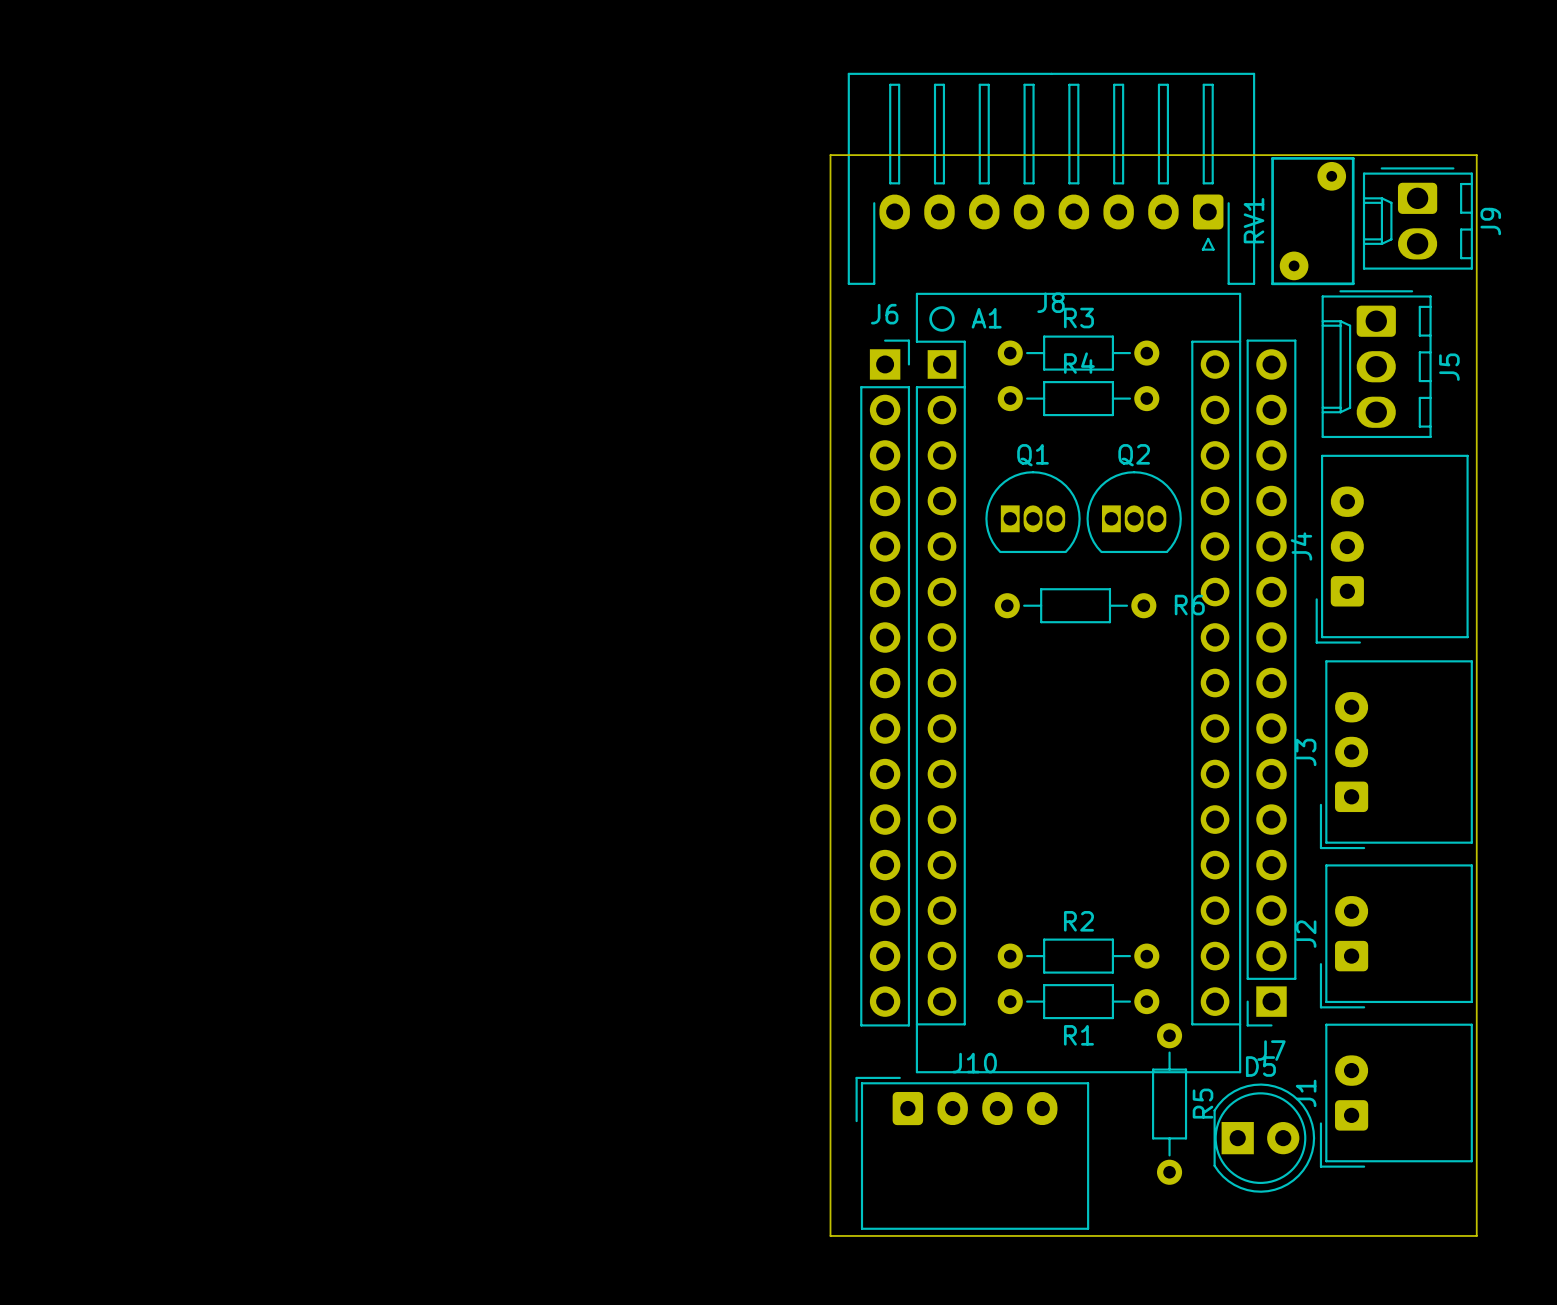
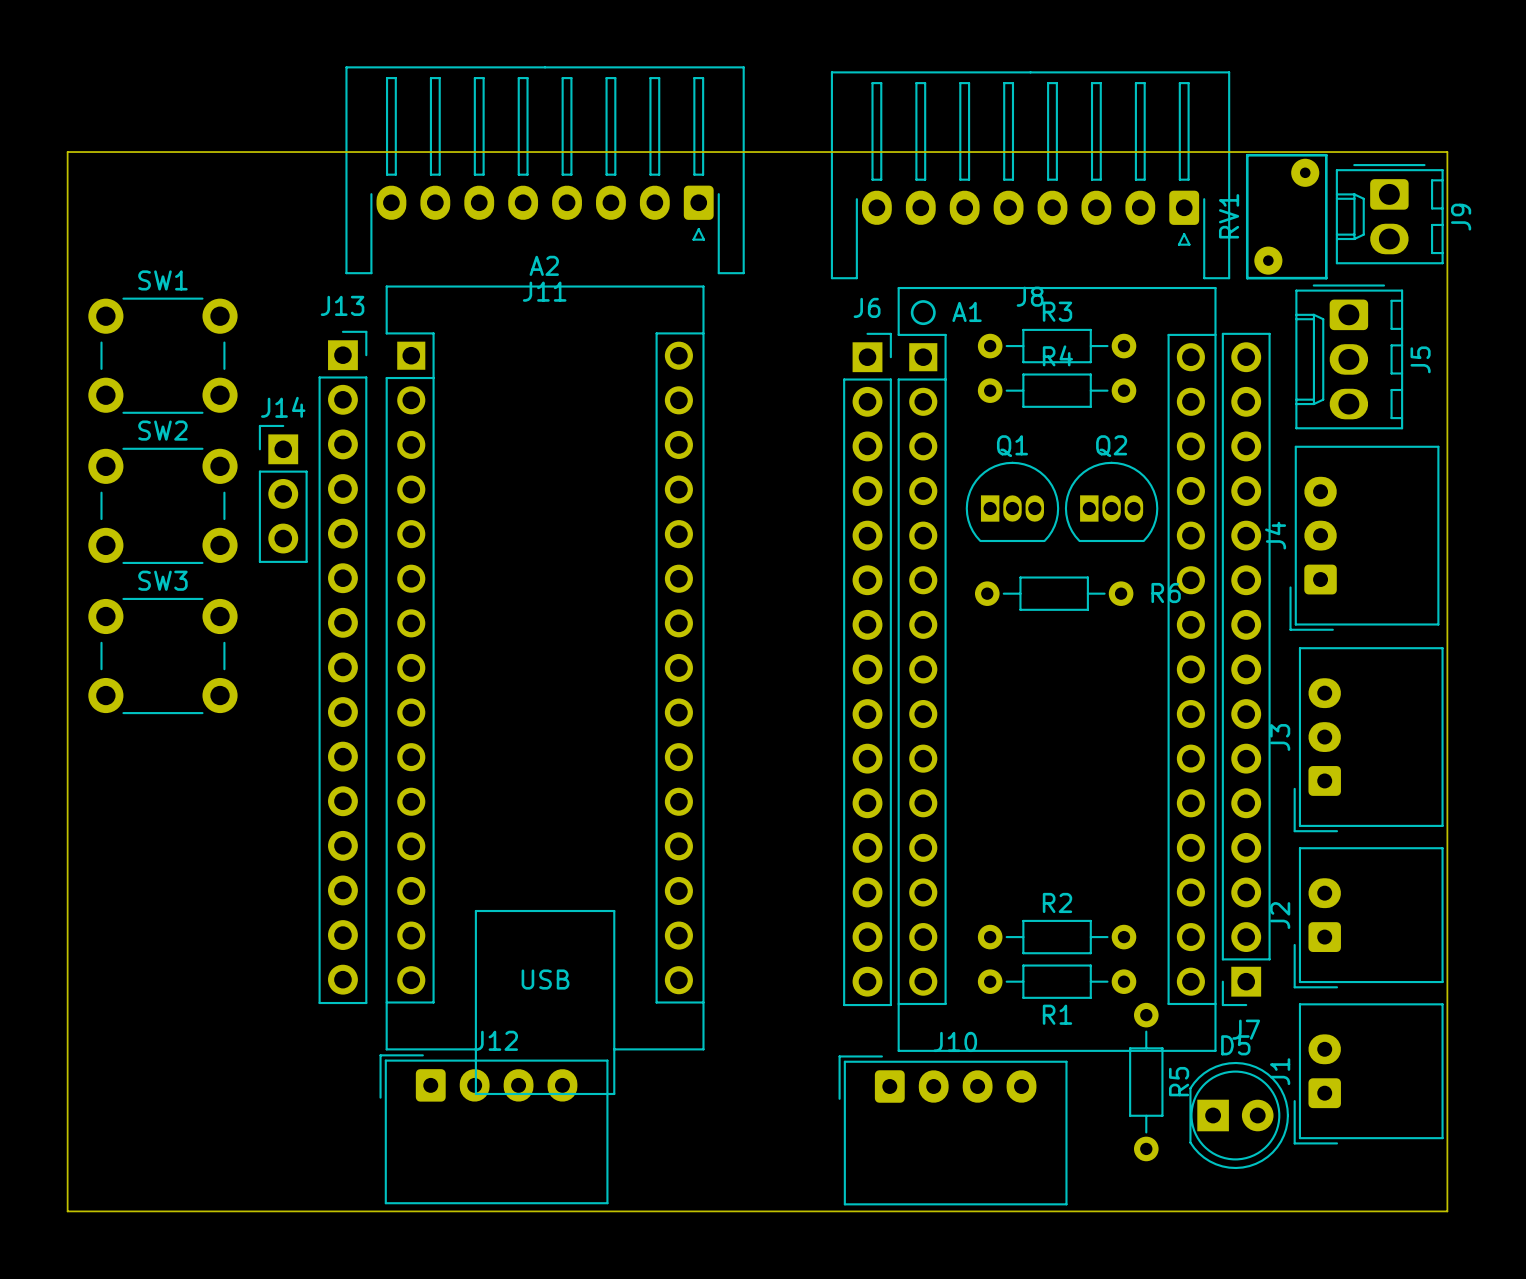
board edge: (830, 155) (830, 1235) -> (813, 152) (67, 152) (67, 1211) (813, 1211)
J11: none -> (545, 170)
SW1: none -> (162, 355)
J14: none -> (283, 493)
SW2: none -> (162, 505)
SW3: none -> (162, 656)
J13: none -> (342, 667)
A2: none -> (545, 690)
J12: none -> (493, 1129)

